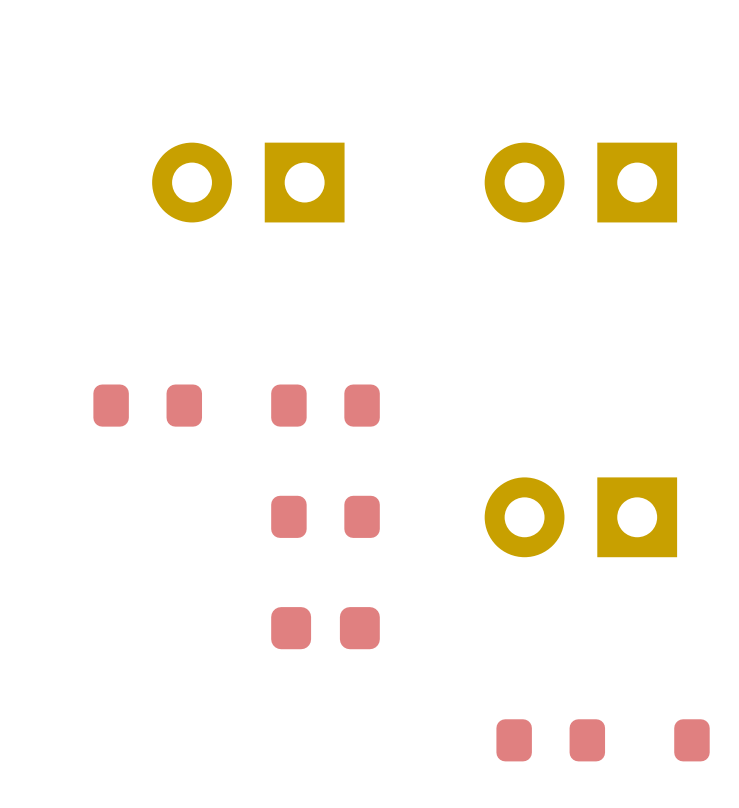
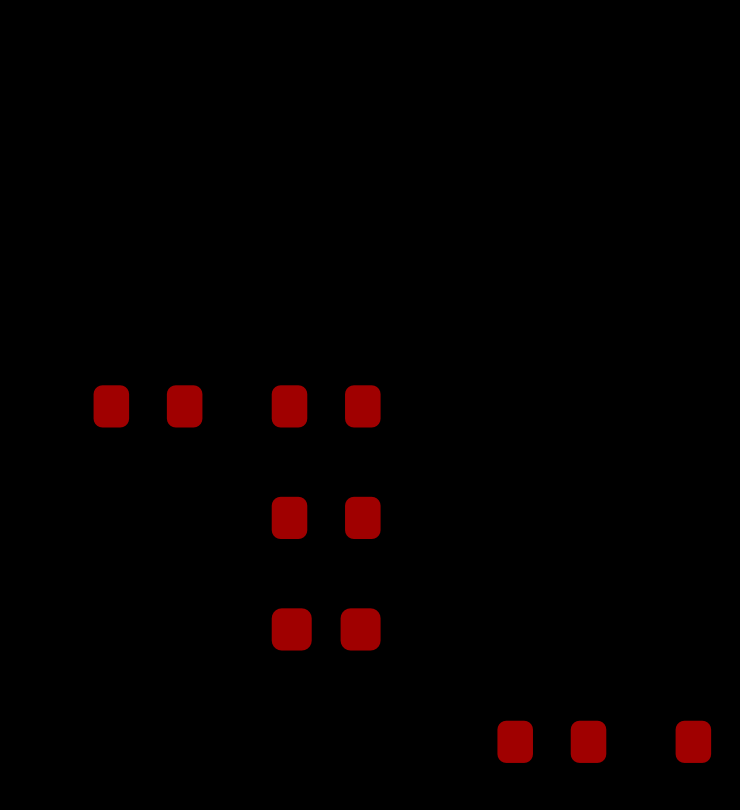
part: (248, 182) -> none
part: (580, 182) -> none
part: (580, 517) -> none

